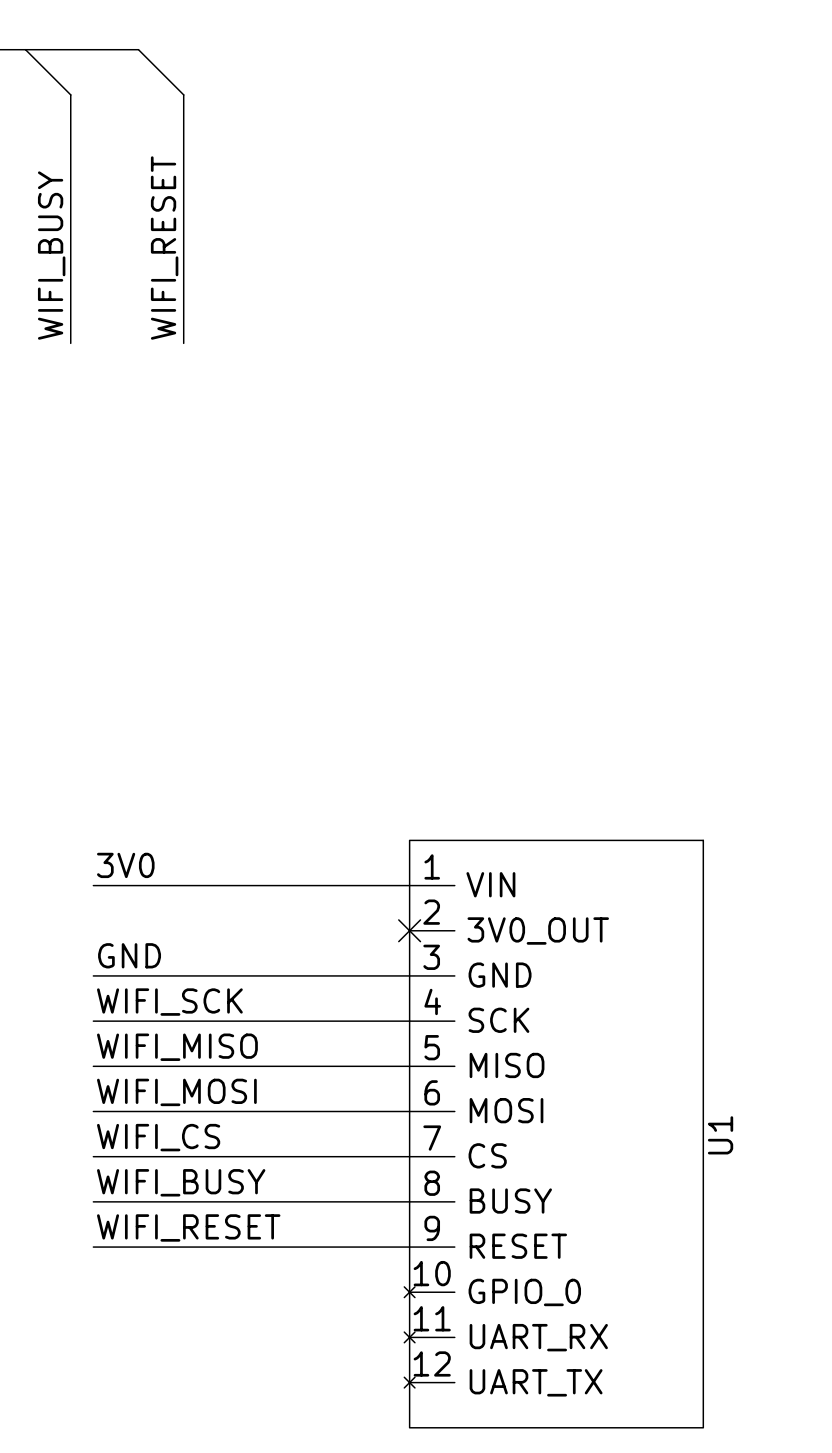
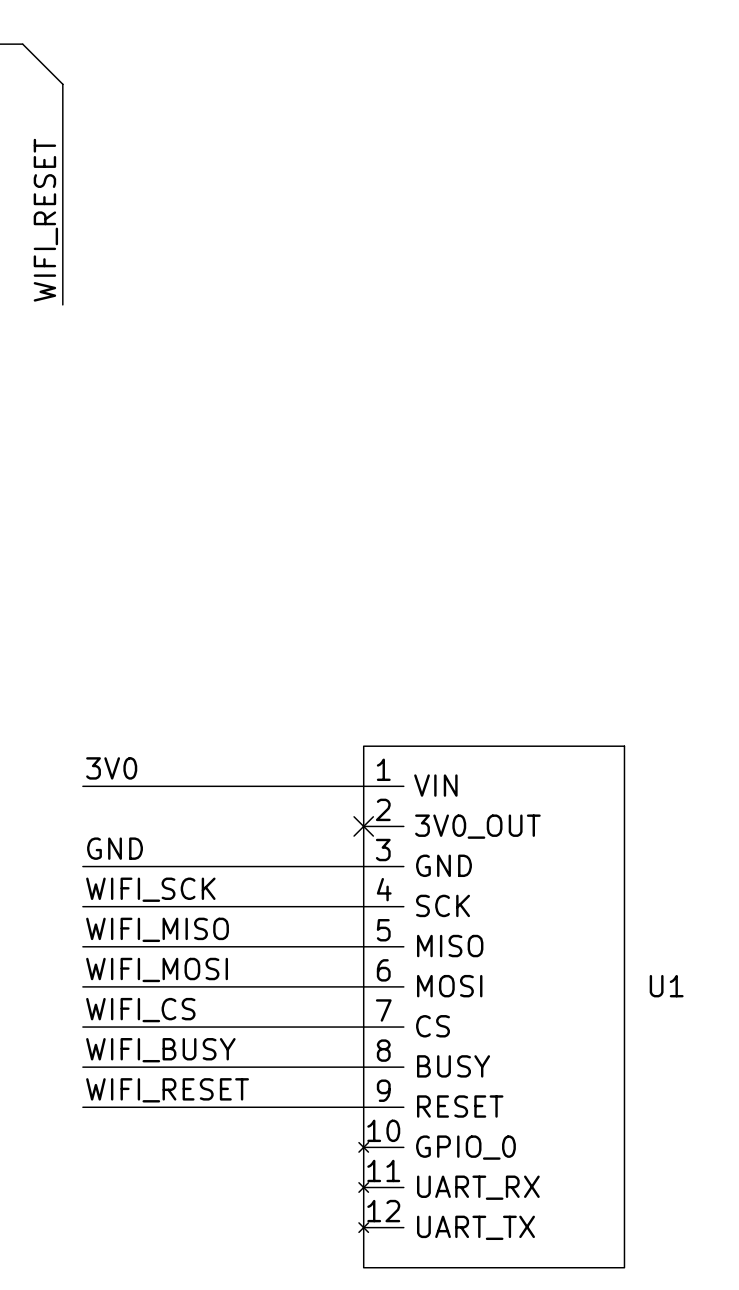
bus: (25, 49) (138, 49) -> none
wire: (138, 49) (183, 94) (183, 343) -> none
label: WIFI_RESET (164, 248) -> none
label: WIFI_BUSY (51, 255) -> WIFI_RESET (45, 220)
U1 name rotation: 0° (720, 1135) -> 90° clockwise (666, 986)

